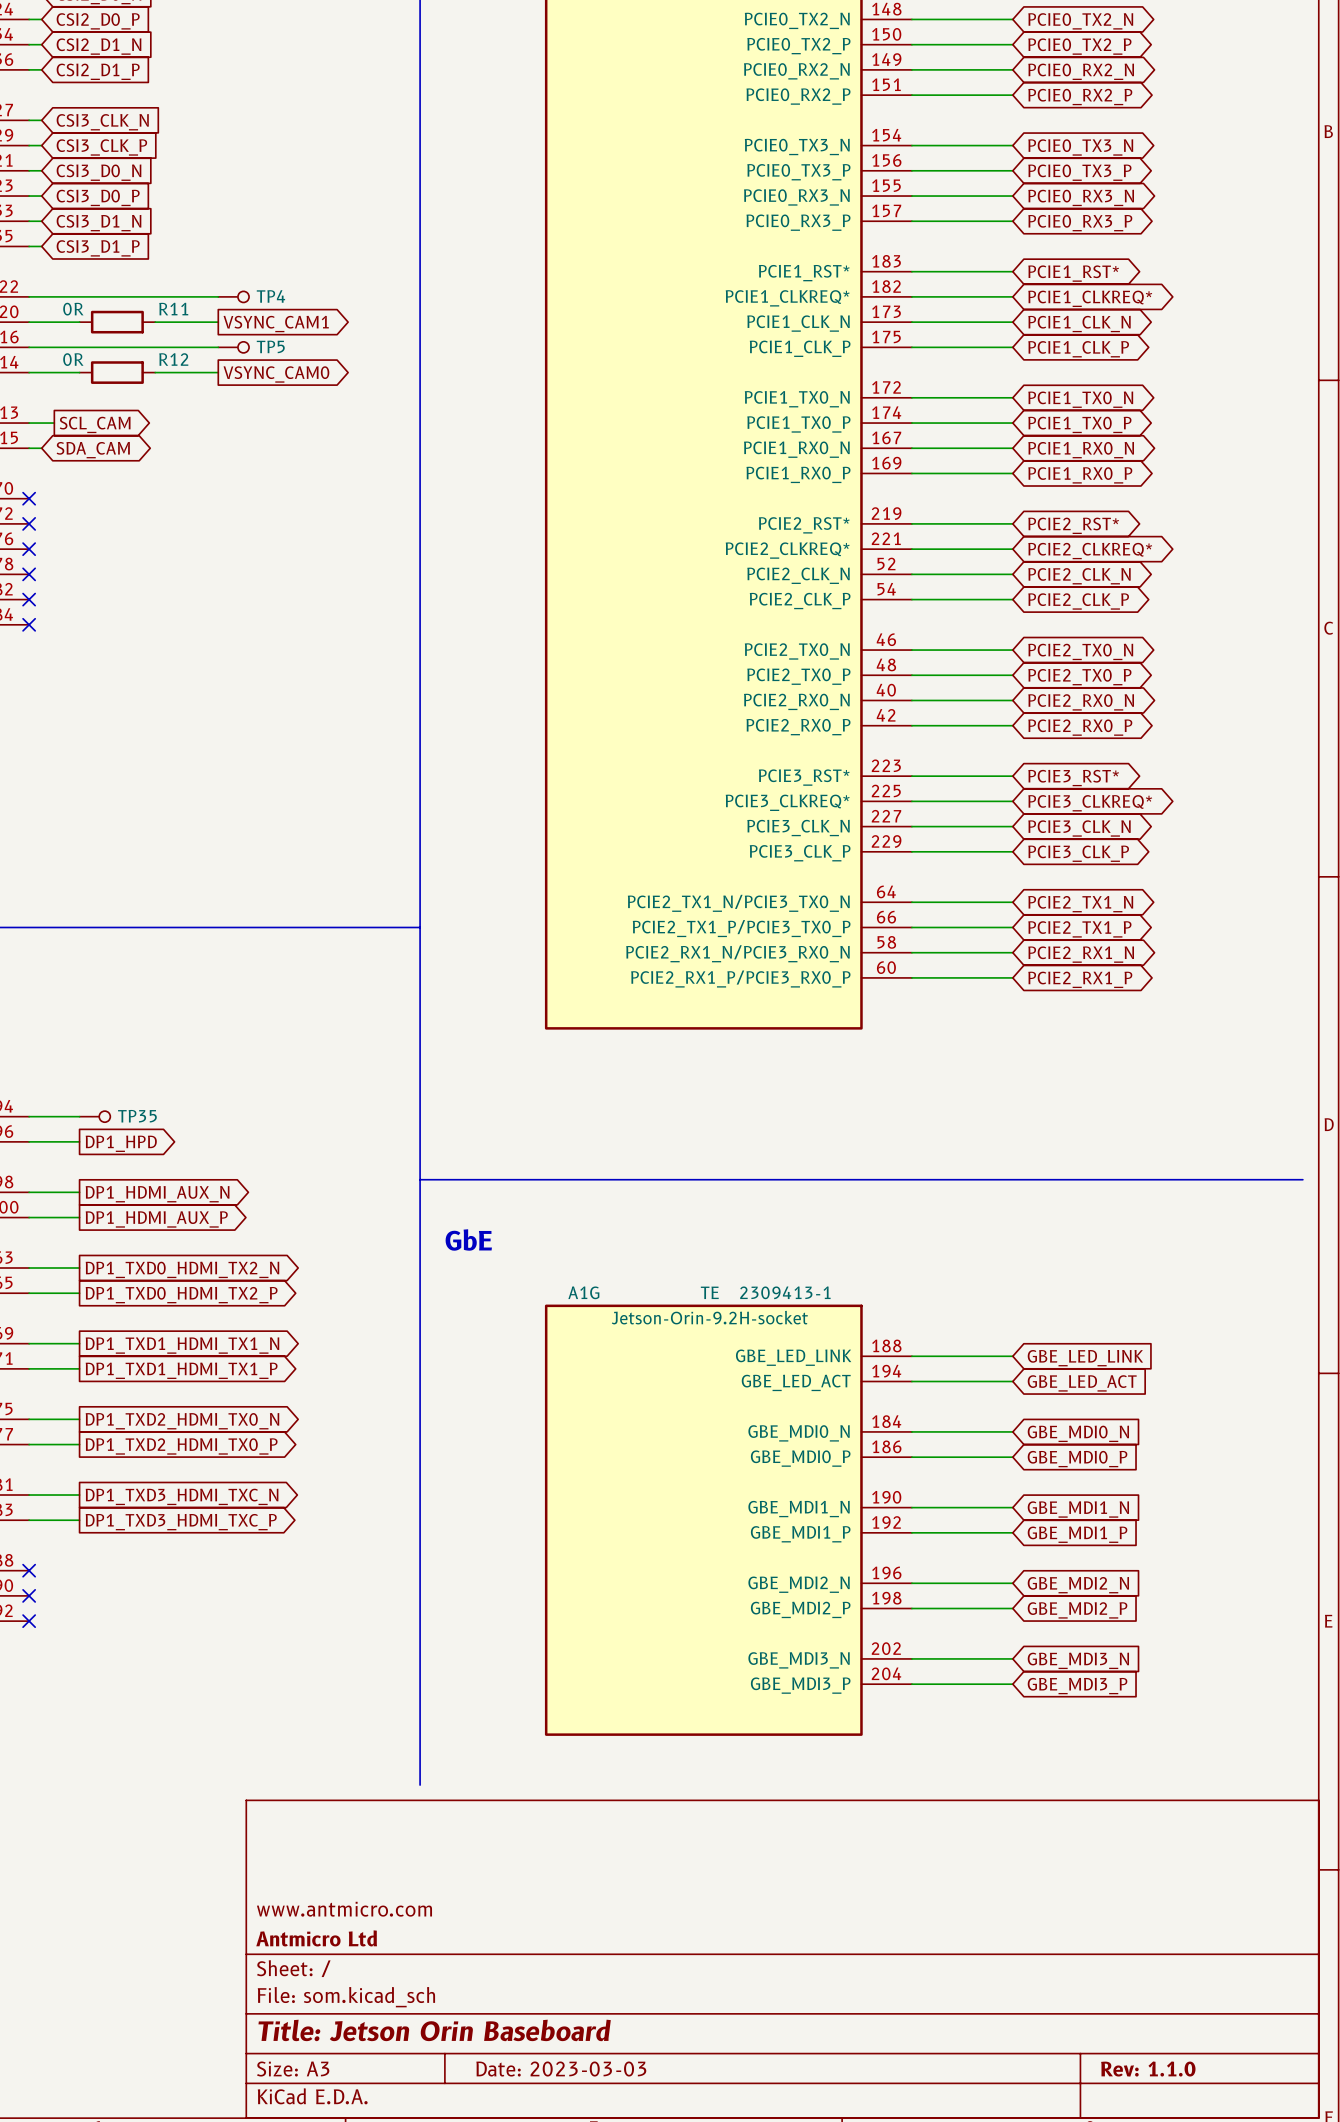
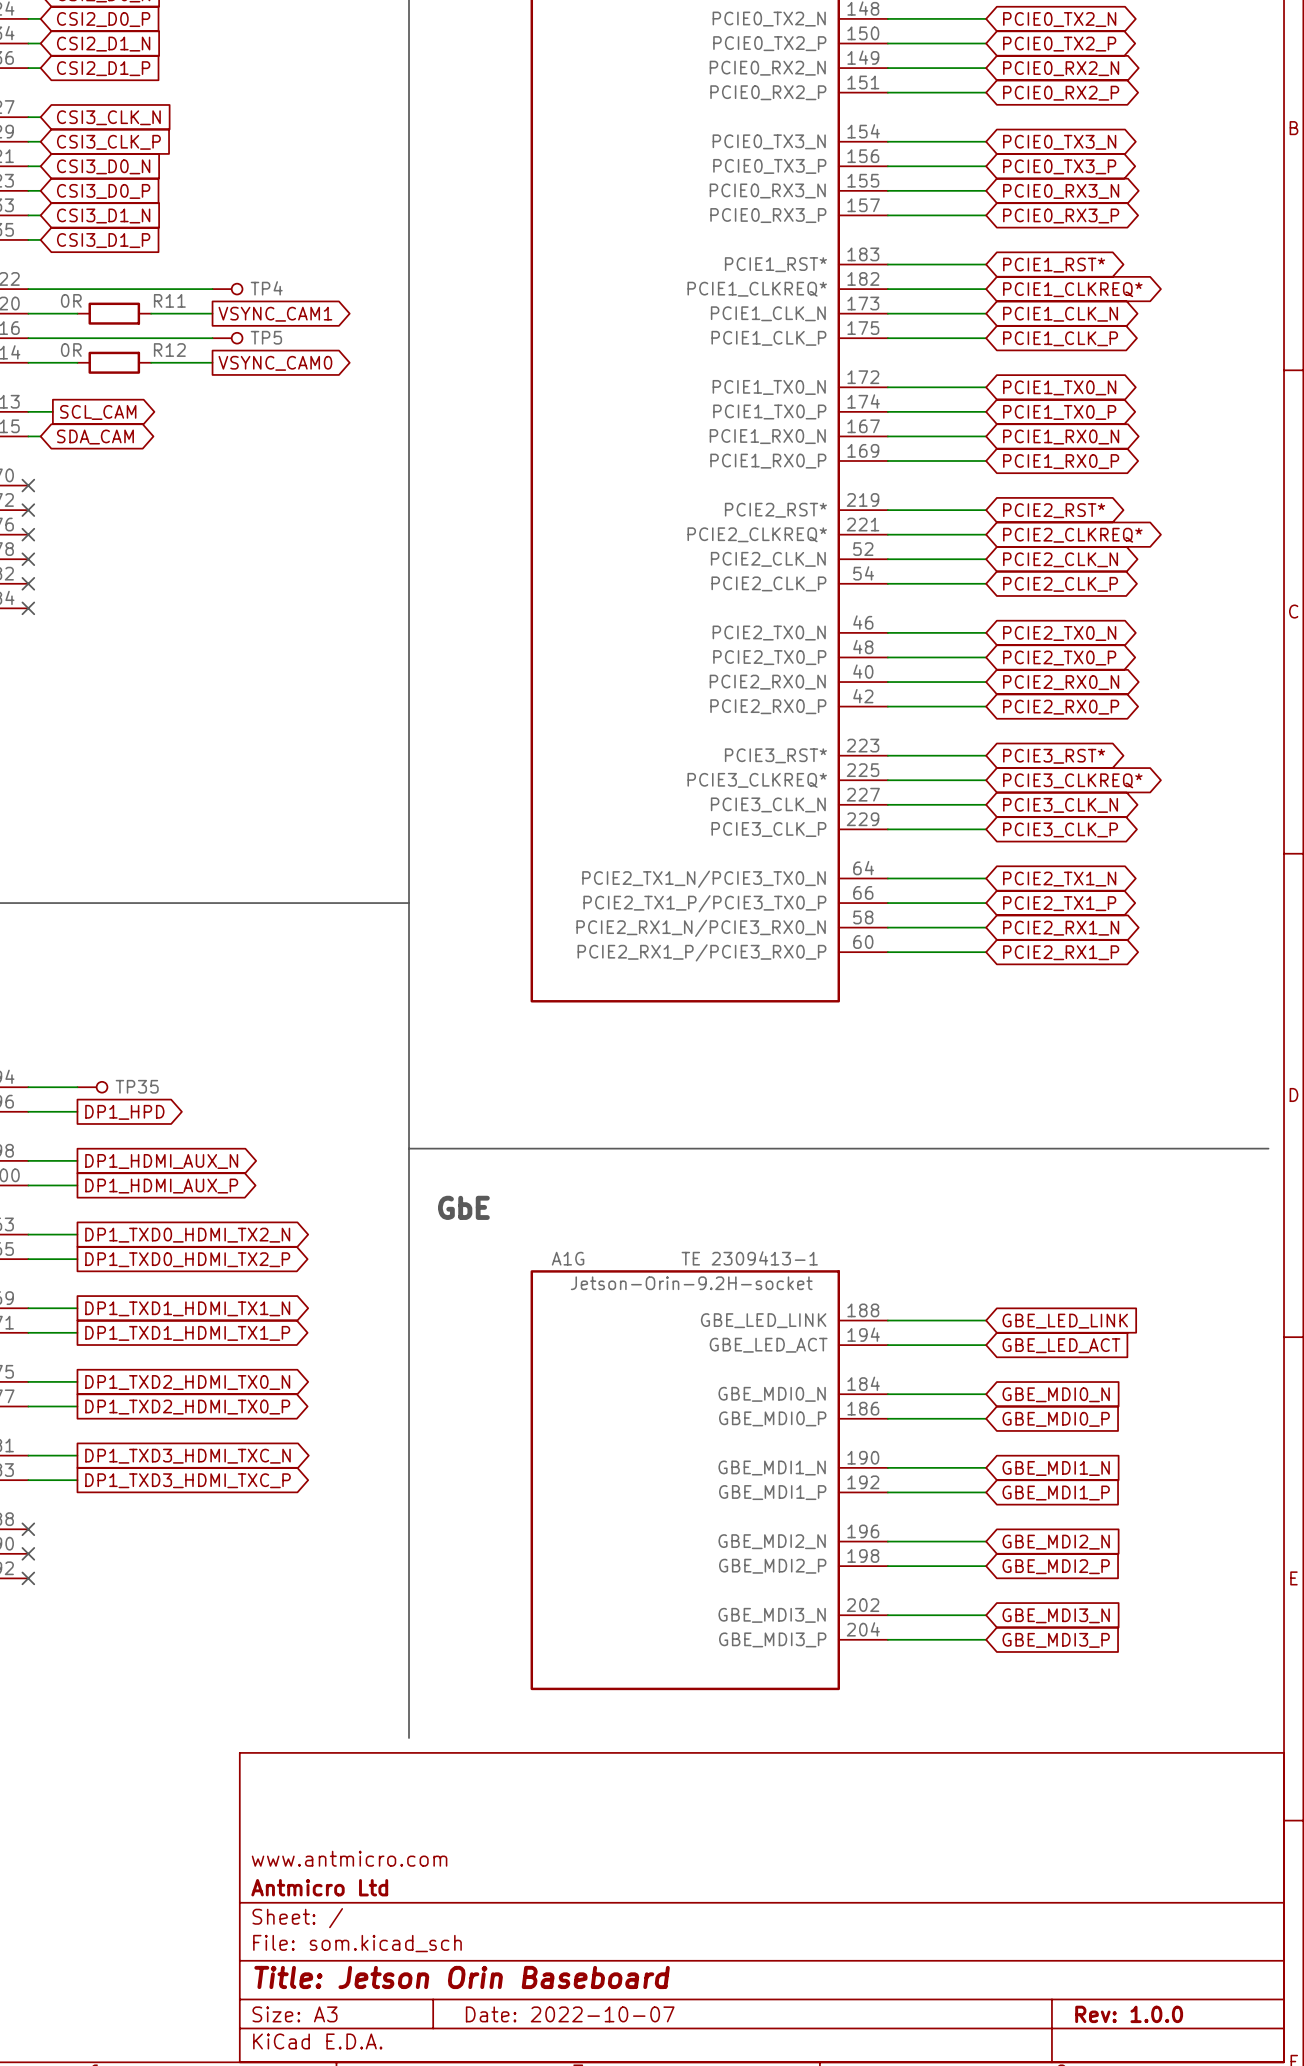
title block: Date: 2023-03-03 (561, 2069) -> Date: 2022-10-07 (570, 2014)
title block: Rev: 1.1.0 (1148, 2069) -> Rev: 1.0.0 (1129, 2014)

